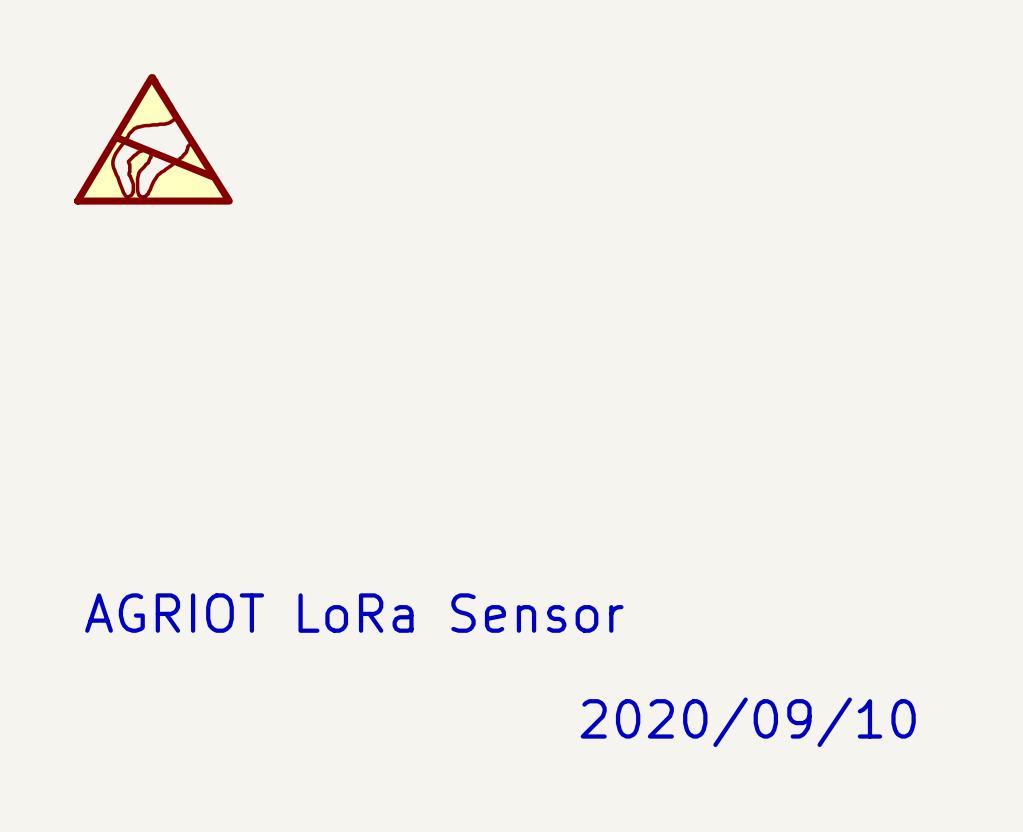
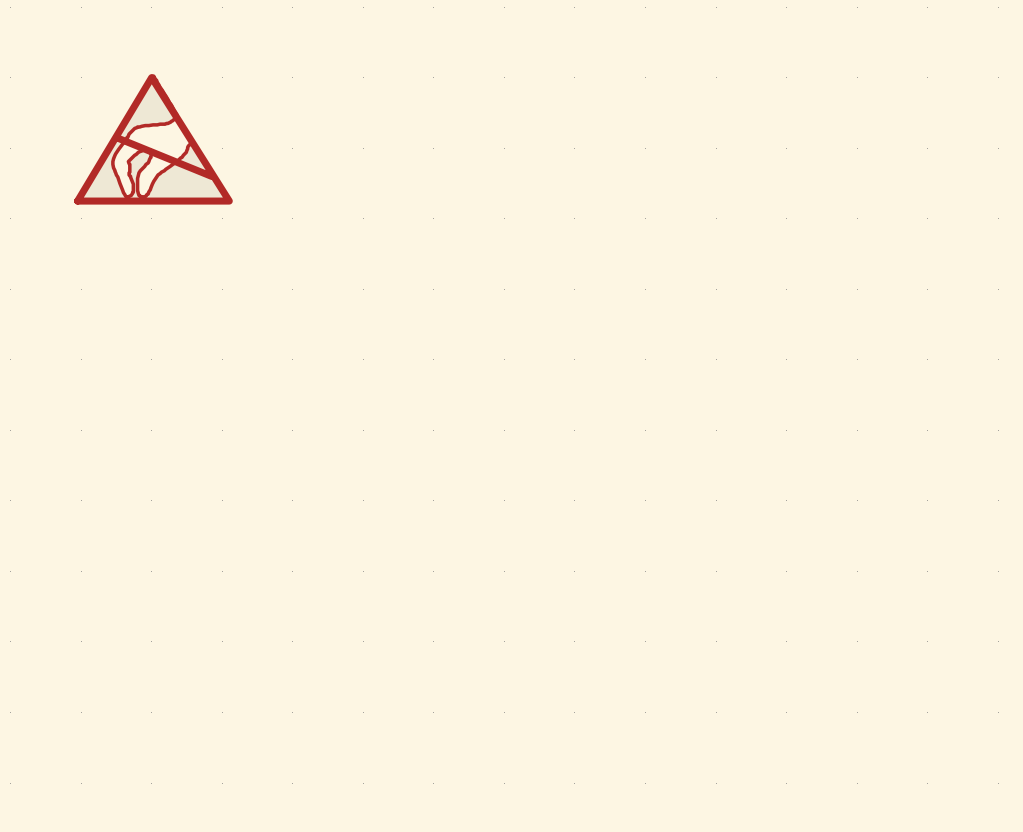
text: AGRIOT LoRa Sensor (354, 613) -> none
text: 2020/09/10 (748, 722) -> none

